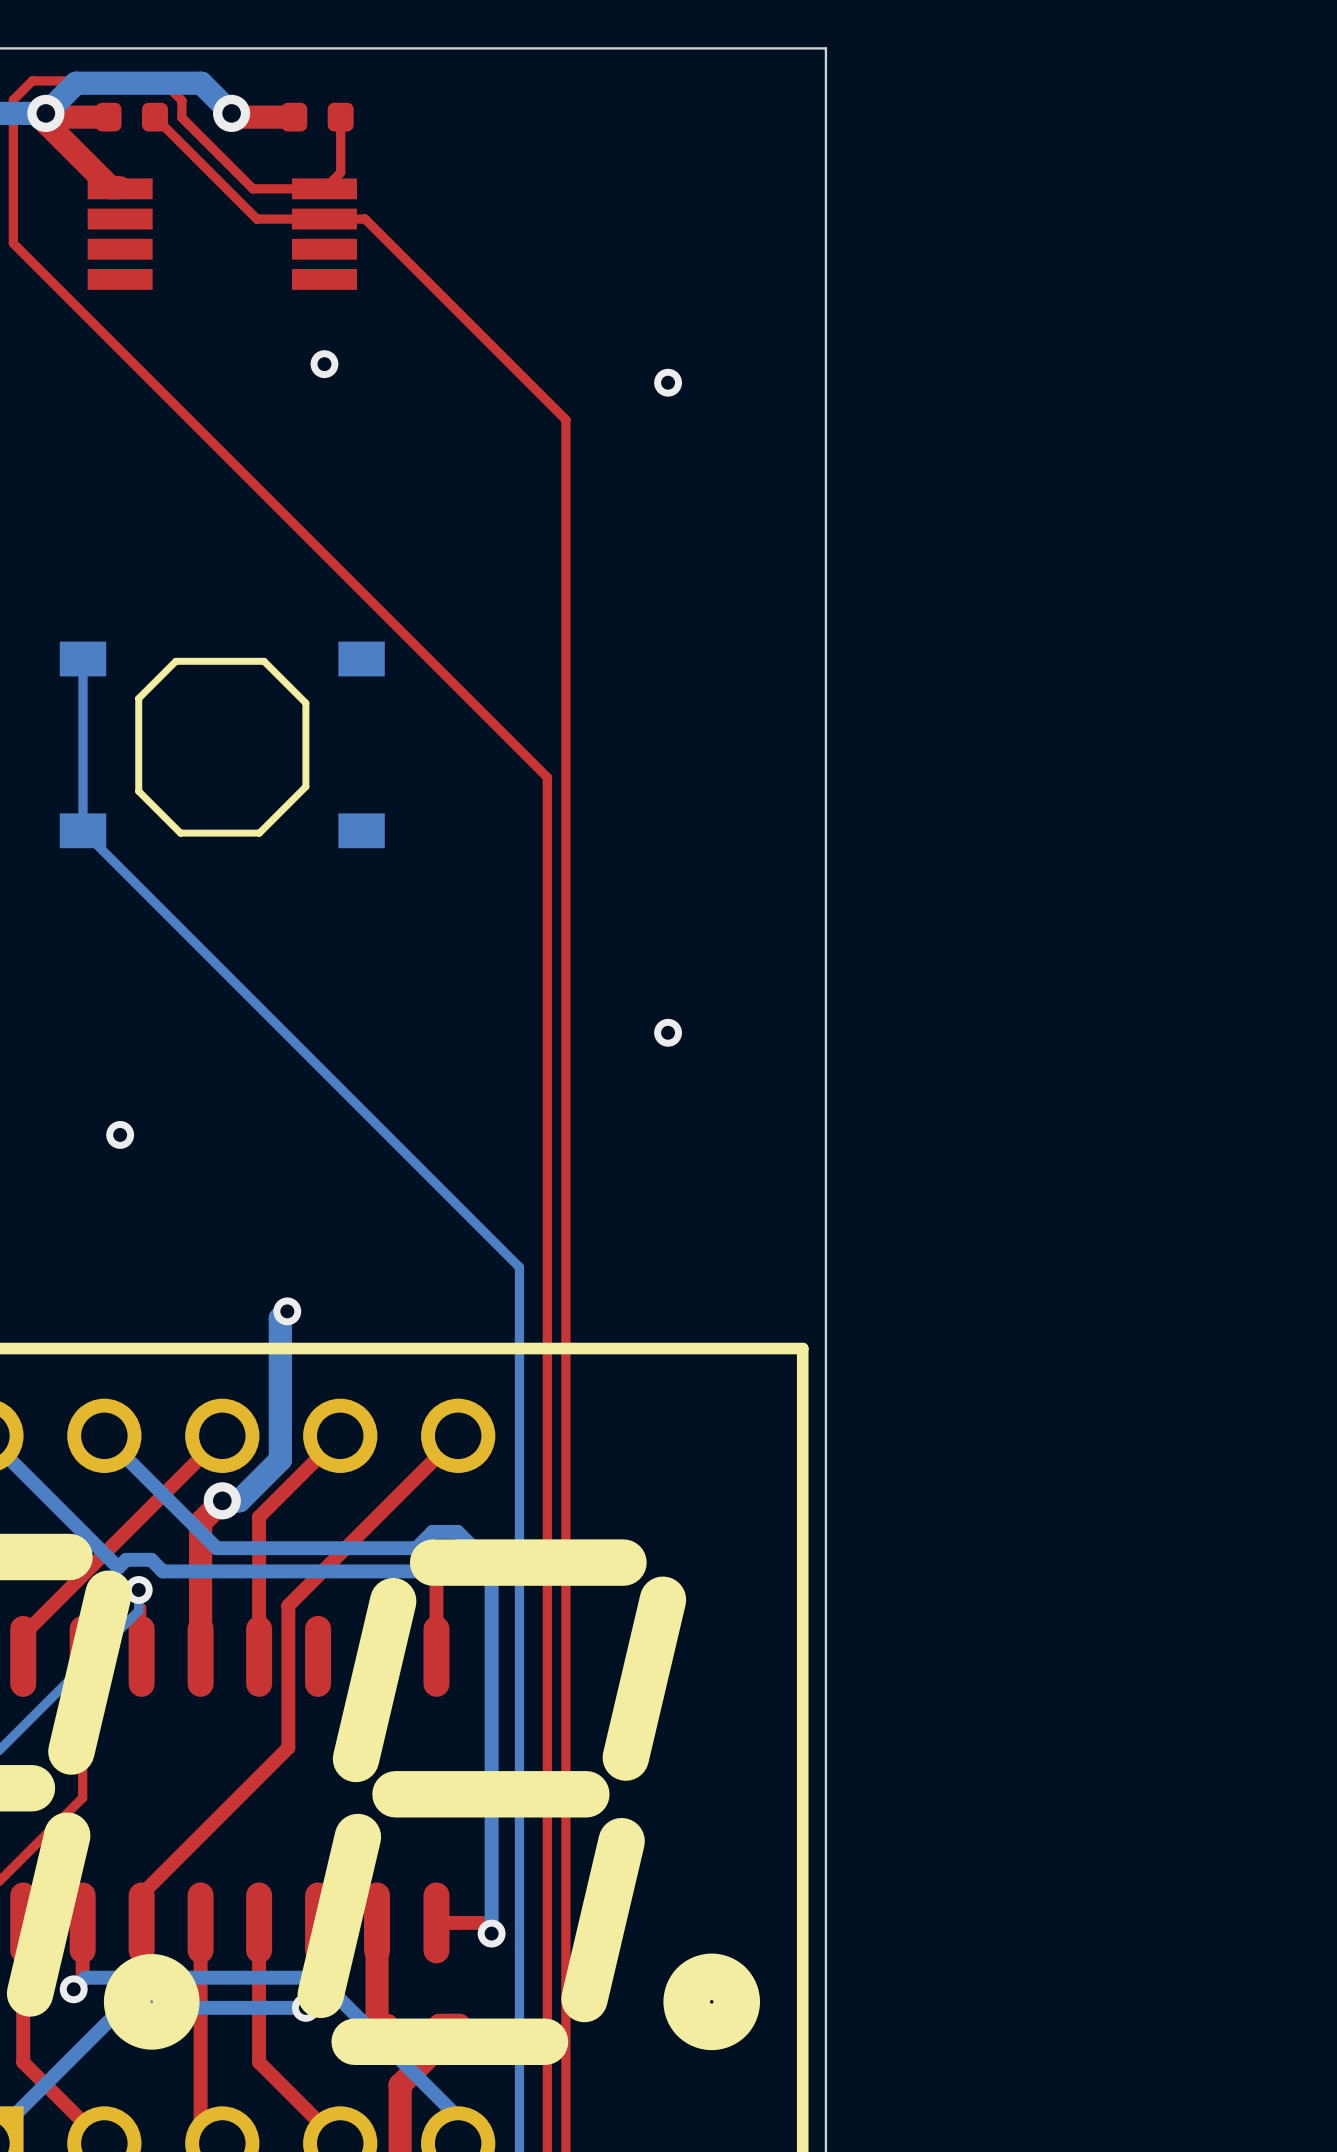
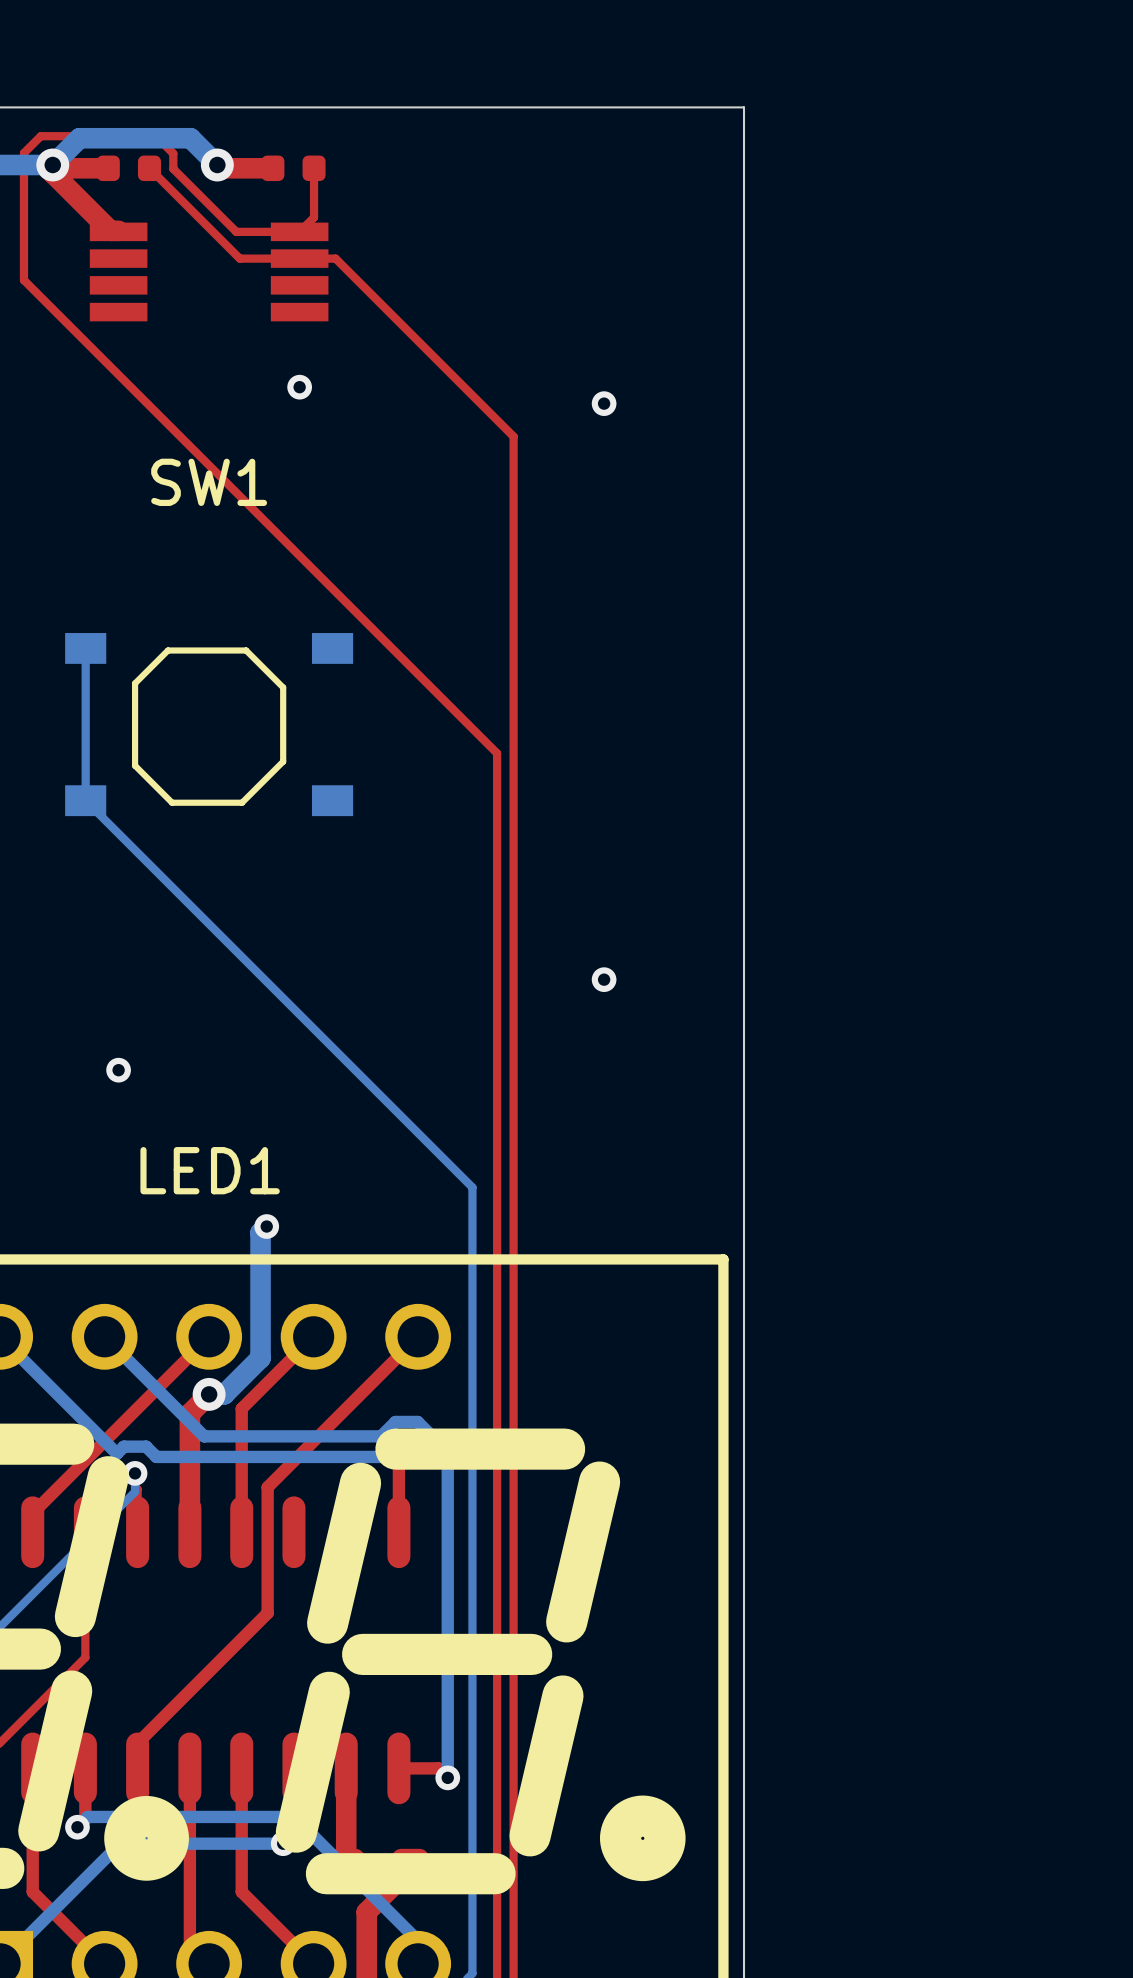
SW1 name: none -> SW1 (209, 482)
LED1 name: none -> LED1 (210, 1170)

